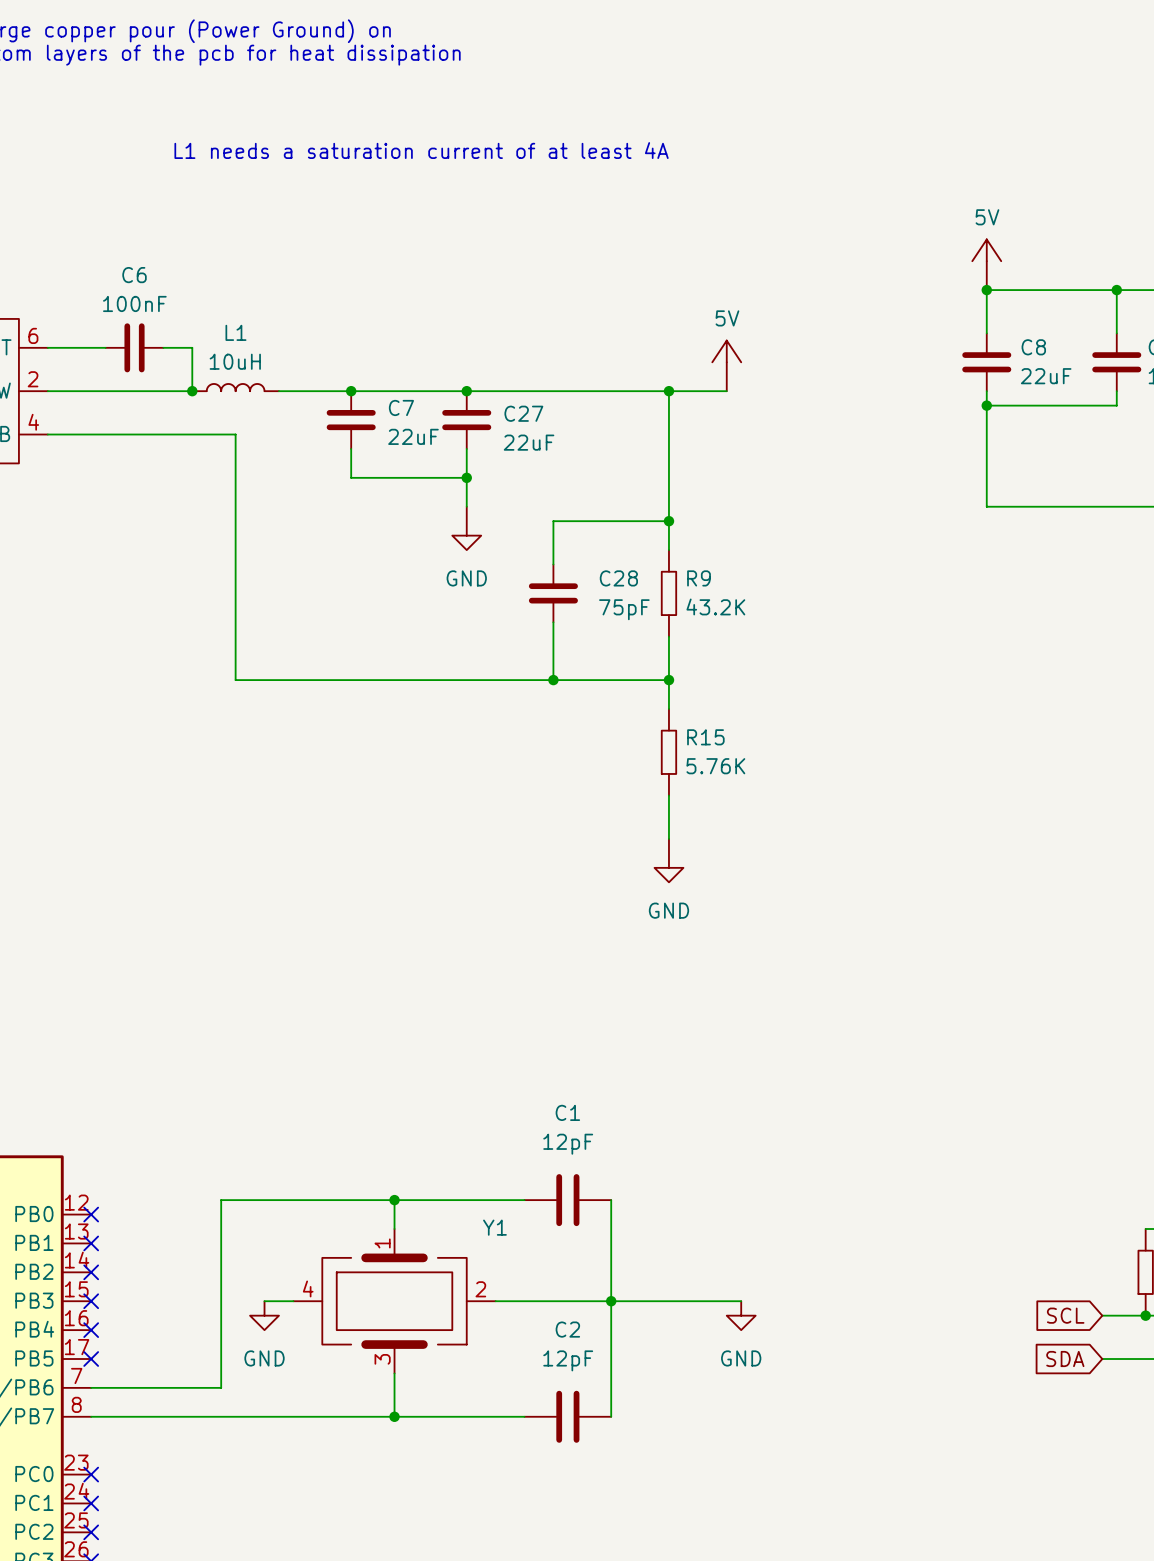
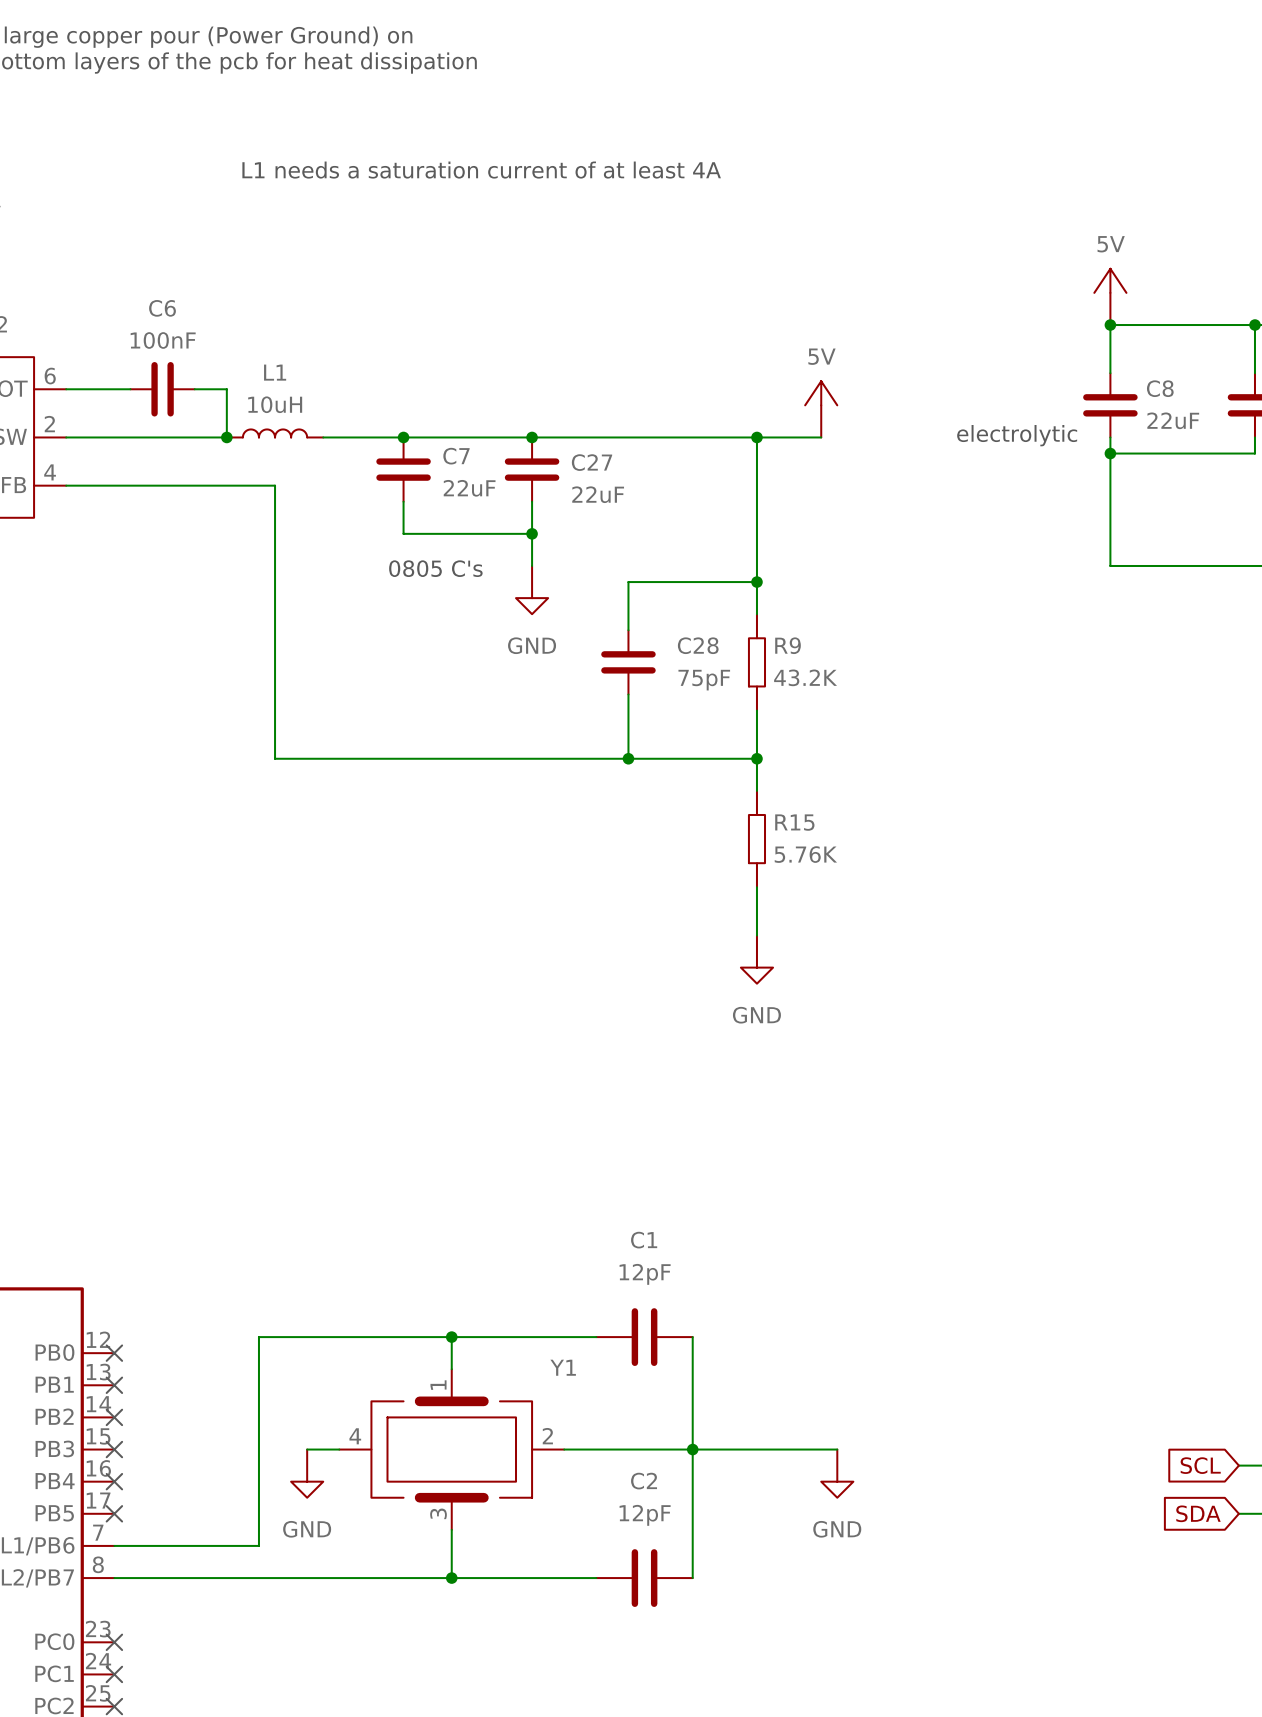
text: none -> electrolytic (1017, 435)
text: none -> 0805 C's (435, 568)
power symbol shape: [250, 1301, 279, 1331] -> [291, 1449, 324, 1498]
power symbol shape: [726, 1301, 756, 1331] -> [821, 1449, 854, 1498]

